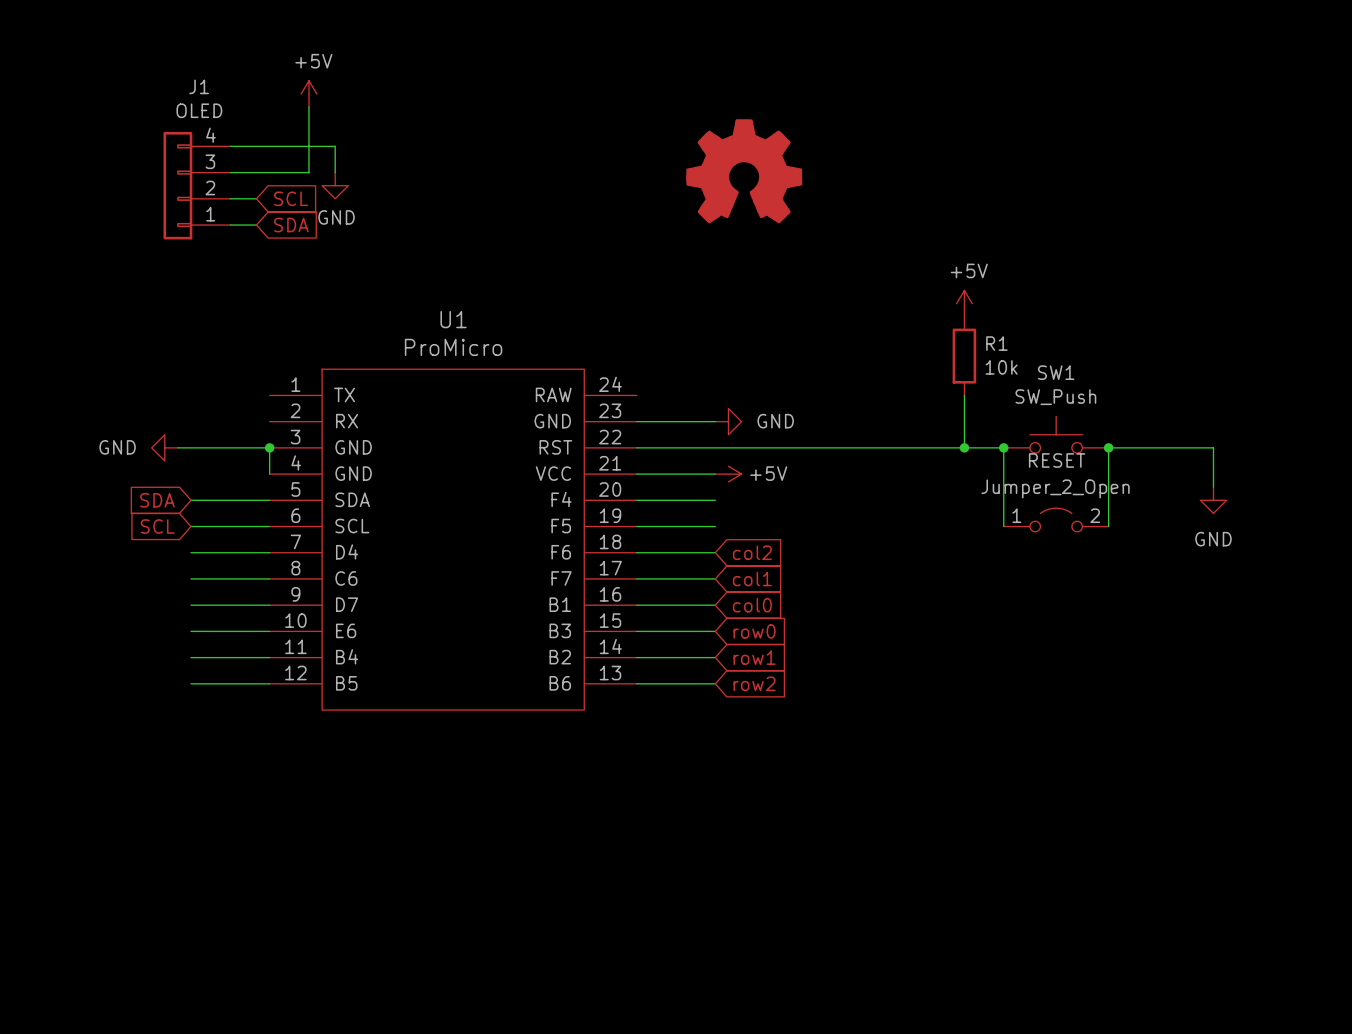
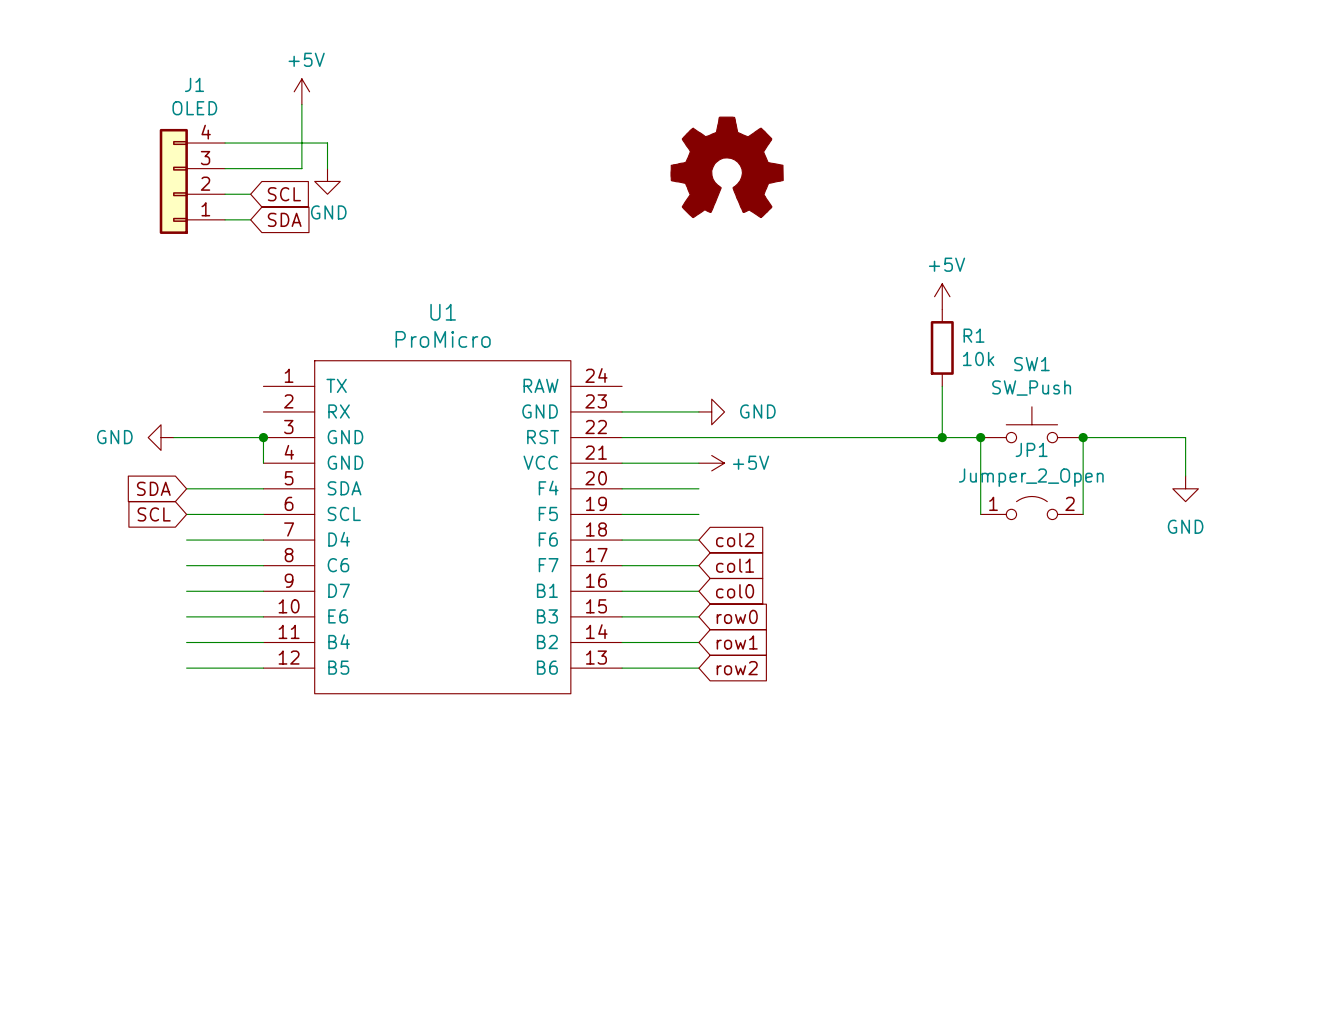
RESET name: RESET (1057, 460) -> JP1 (1031, 449)

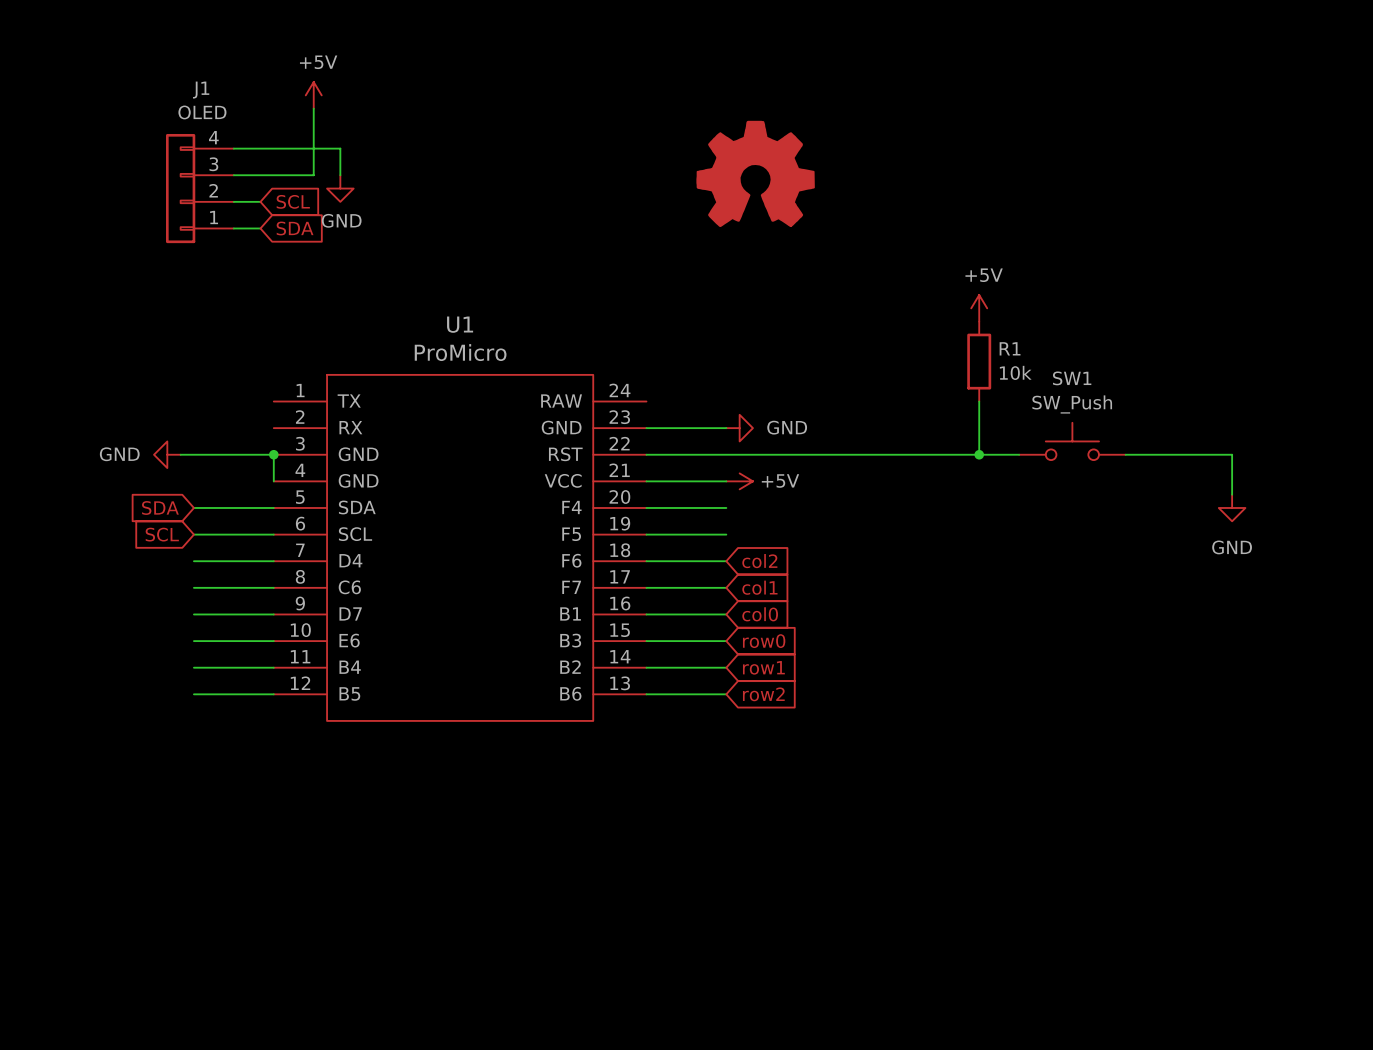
wire: (980, 437) (980, 514) -> none
junction: (980, 437) -> none
wire: (1083, 437) (1083, 514) -> none
junction: (1083, 437) -> none
JP1: Jumper_2_Open (1031, 508) -> none

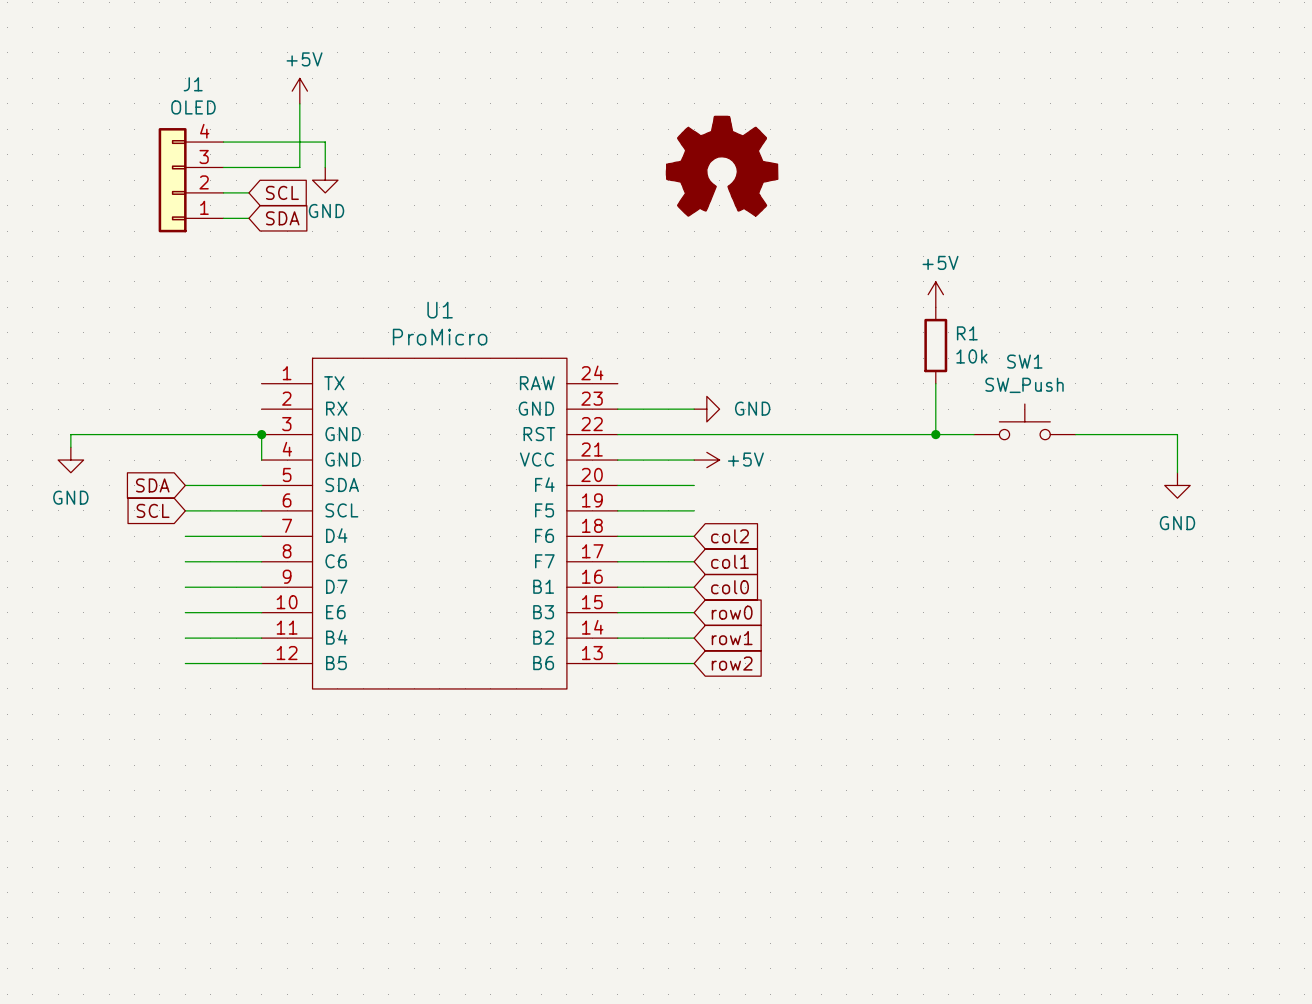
power symbol rotation: 0° (167, 454) -> 90° counterclockwise (70, 460)
power symbol position: GND (167, 454) -> GND (70, 460)
wire: none -> (172, 434) (70, 434) (70, 447)

